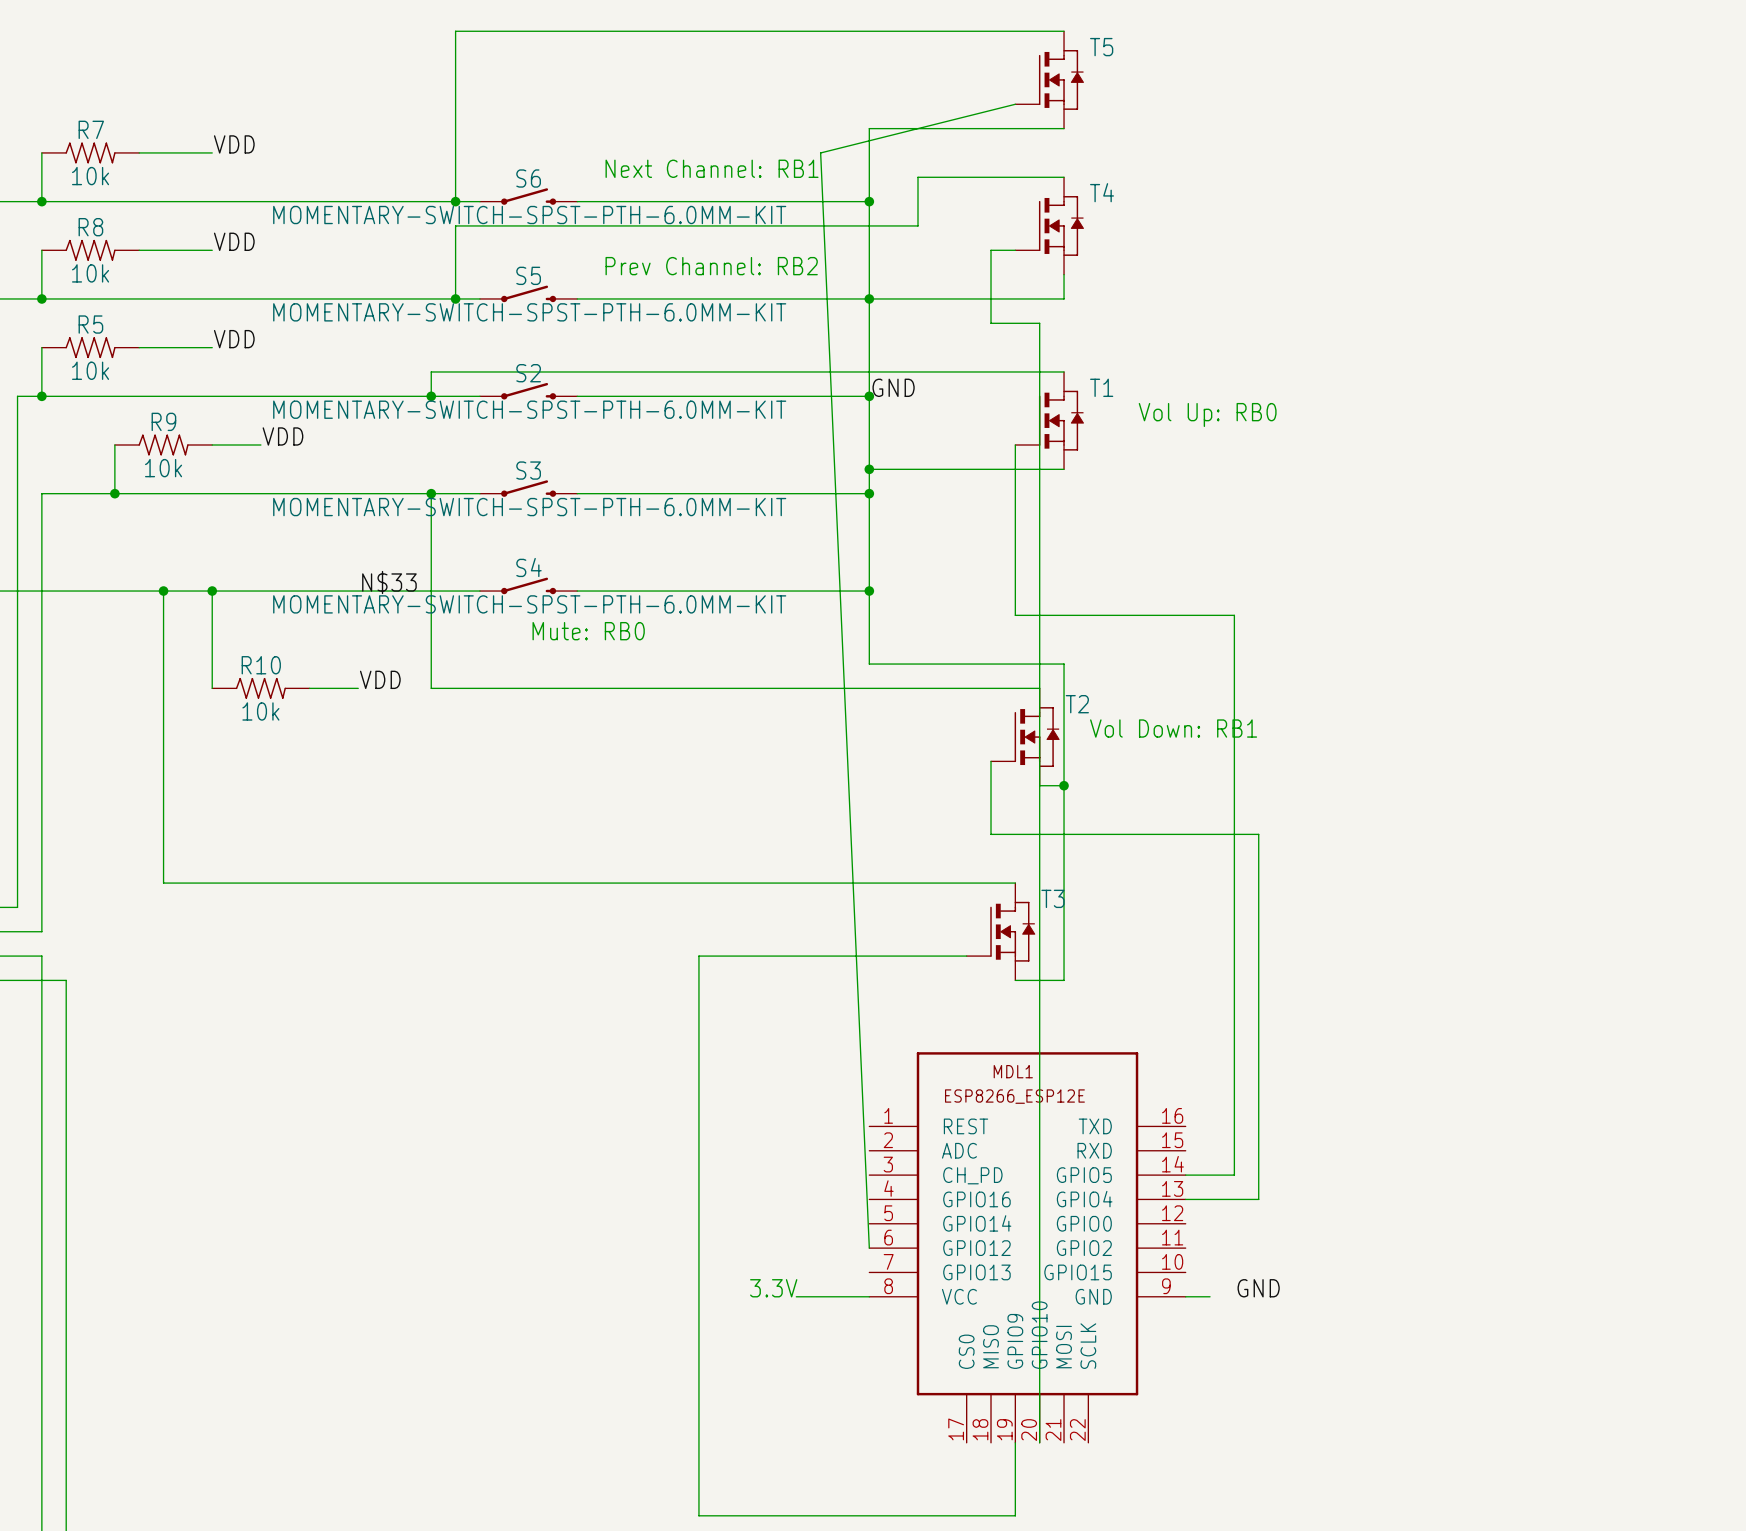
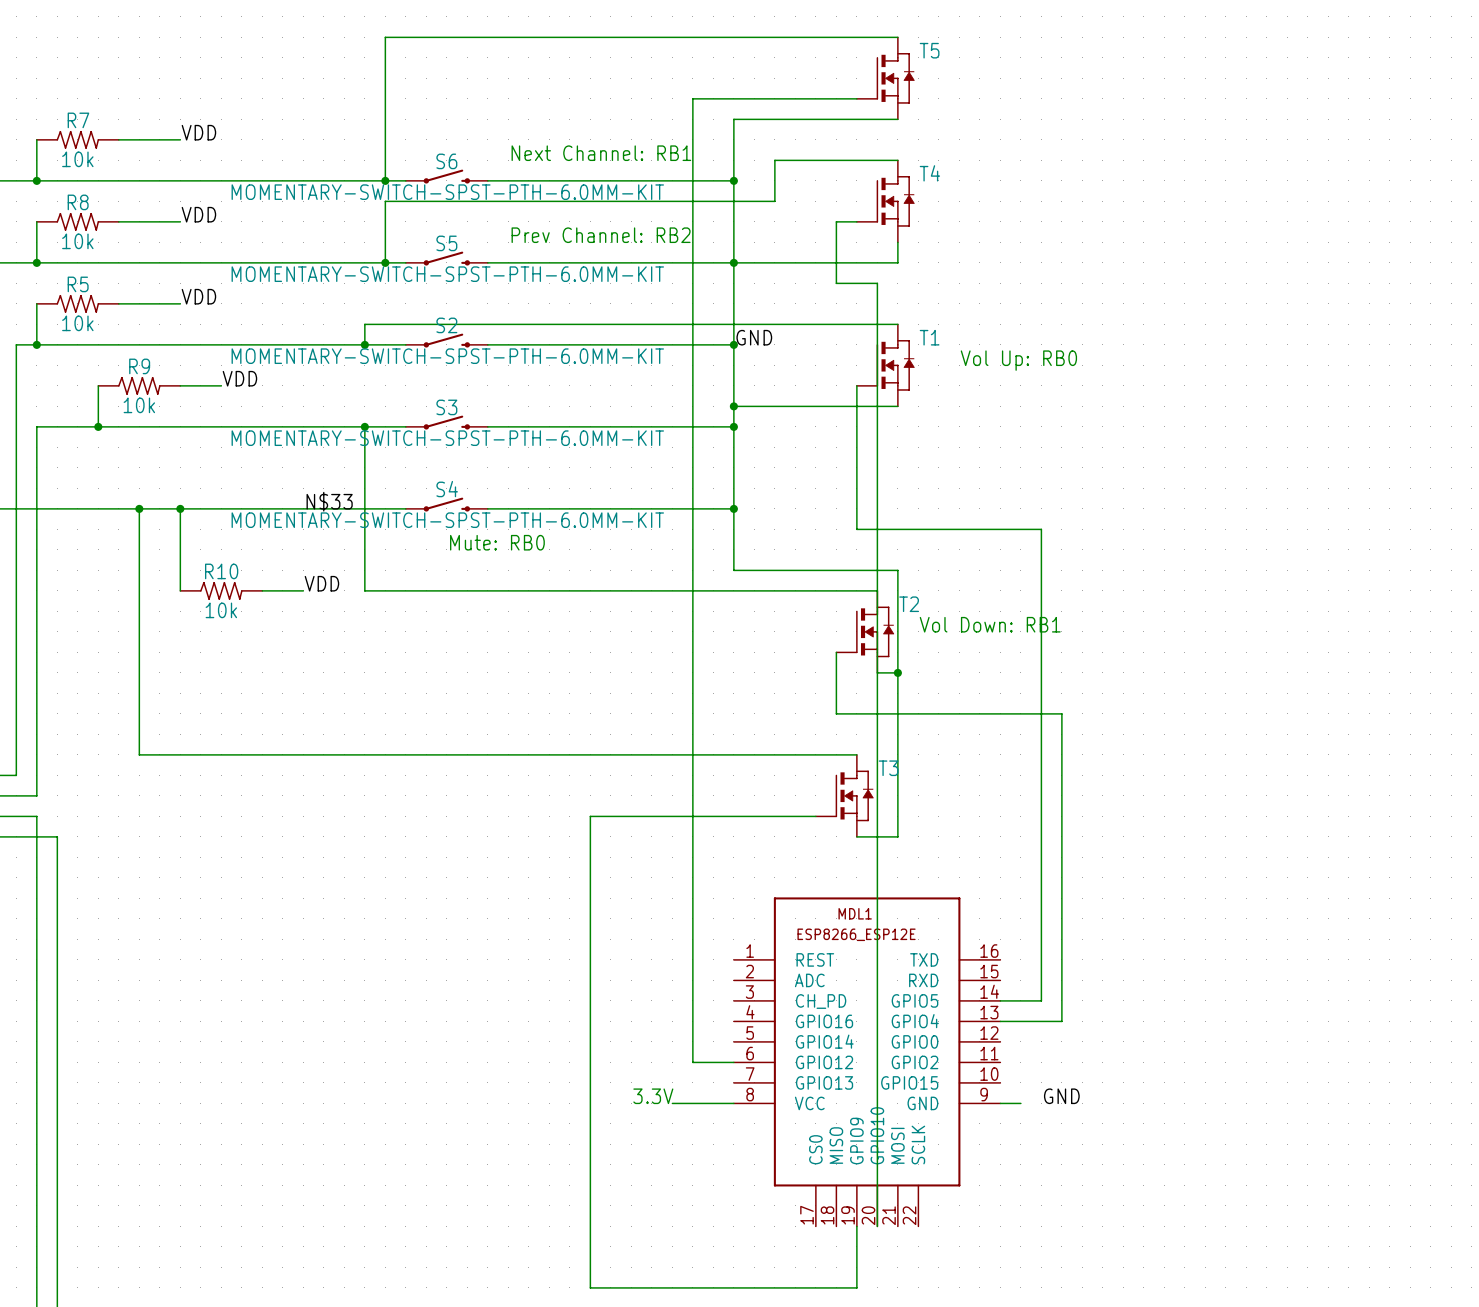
wire: (1015, 104) (820, 152) (869, 1248) -> (856, 98) (692, 98) (692, 1062) (733, 1062)

